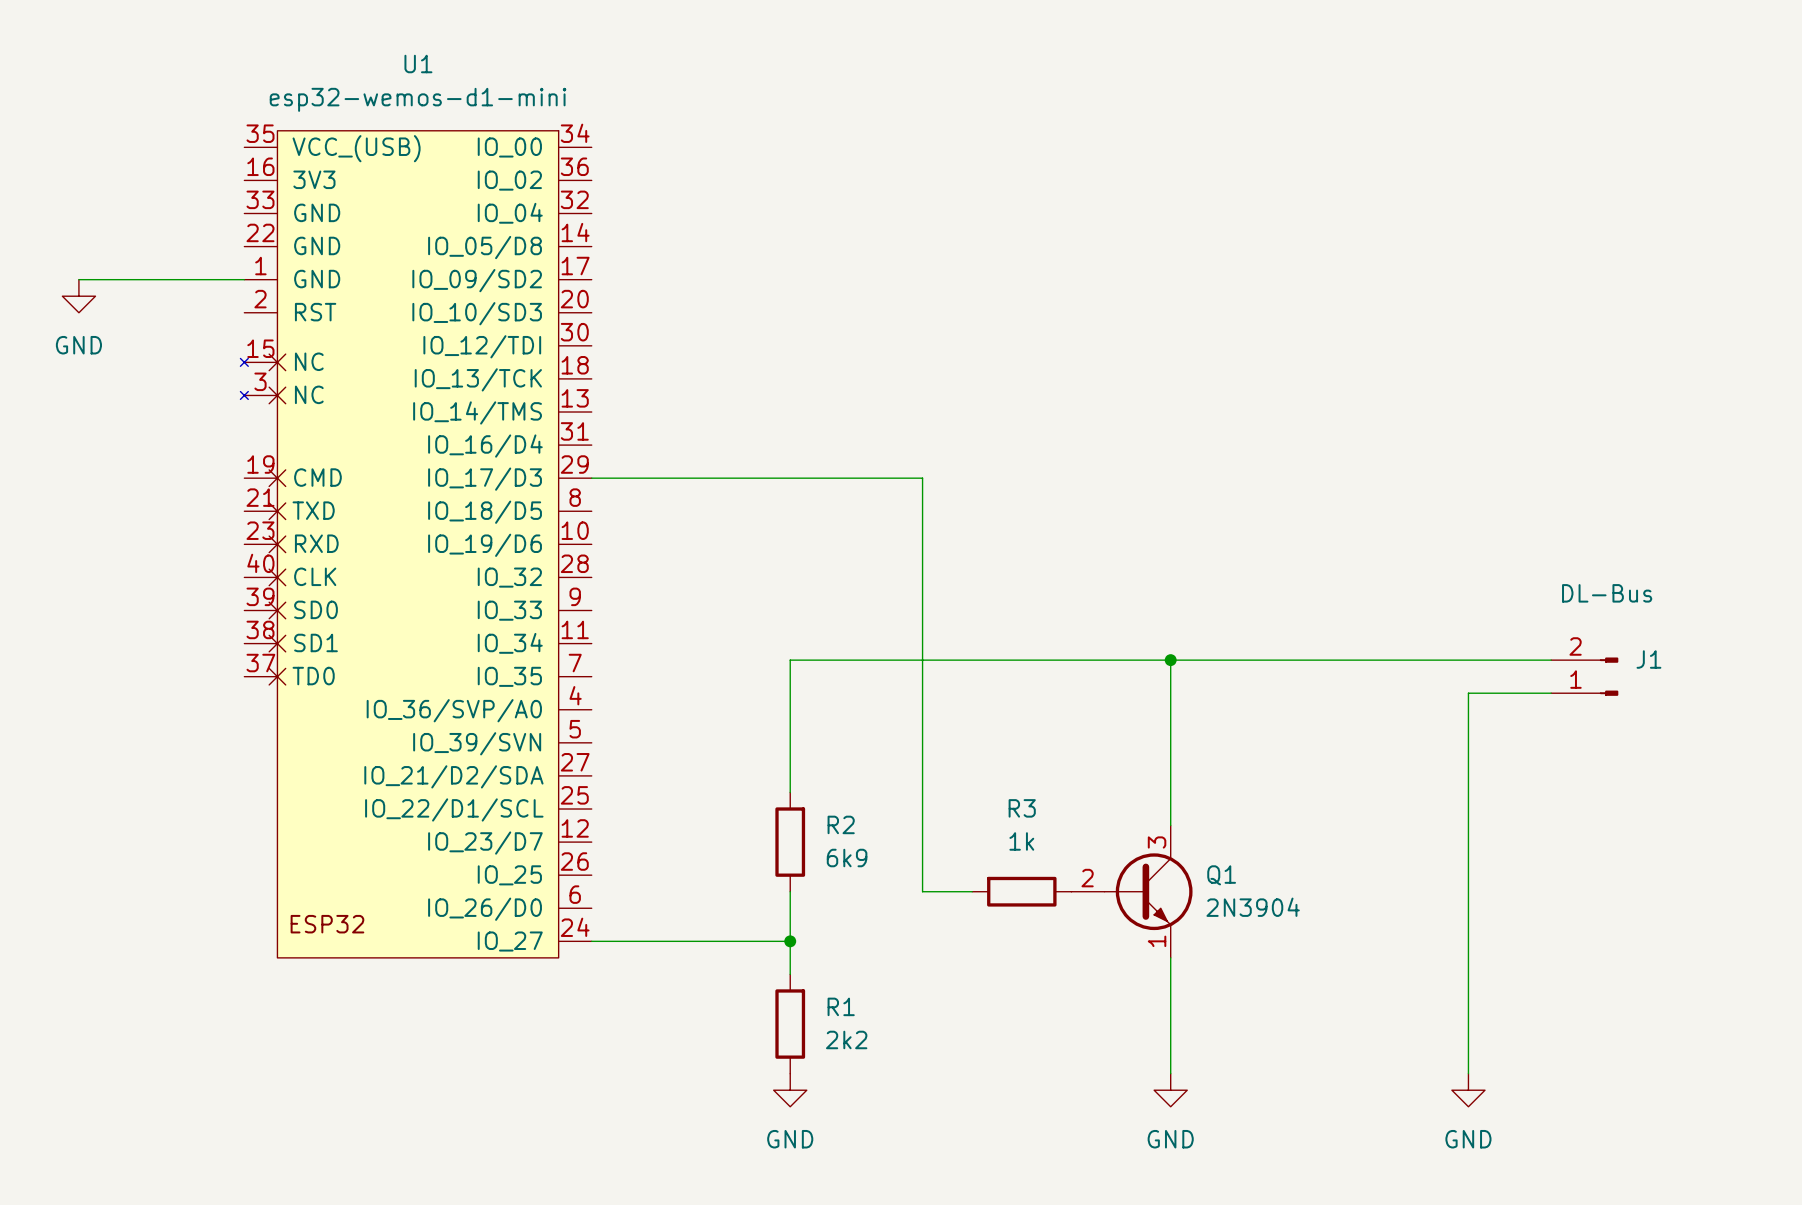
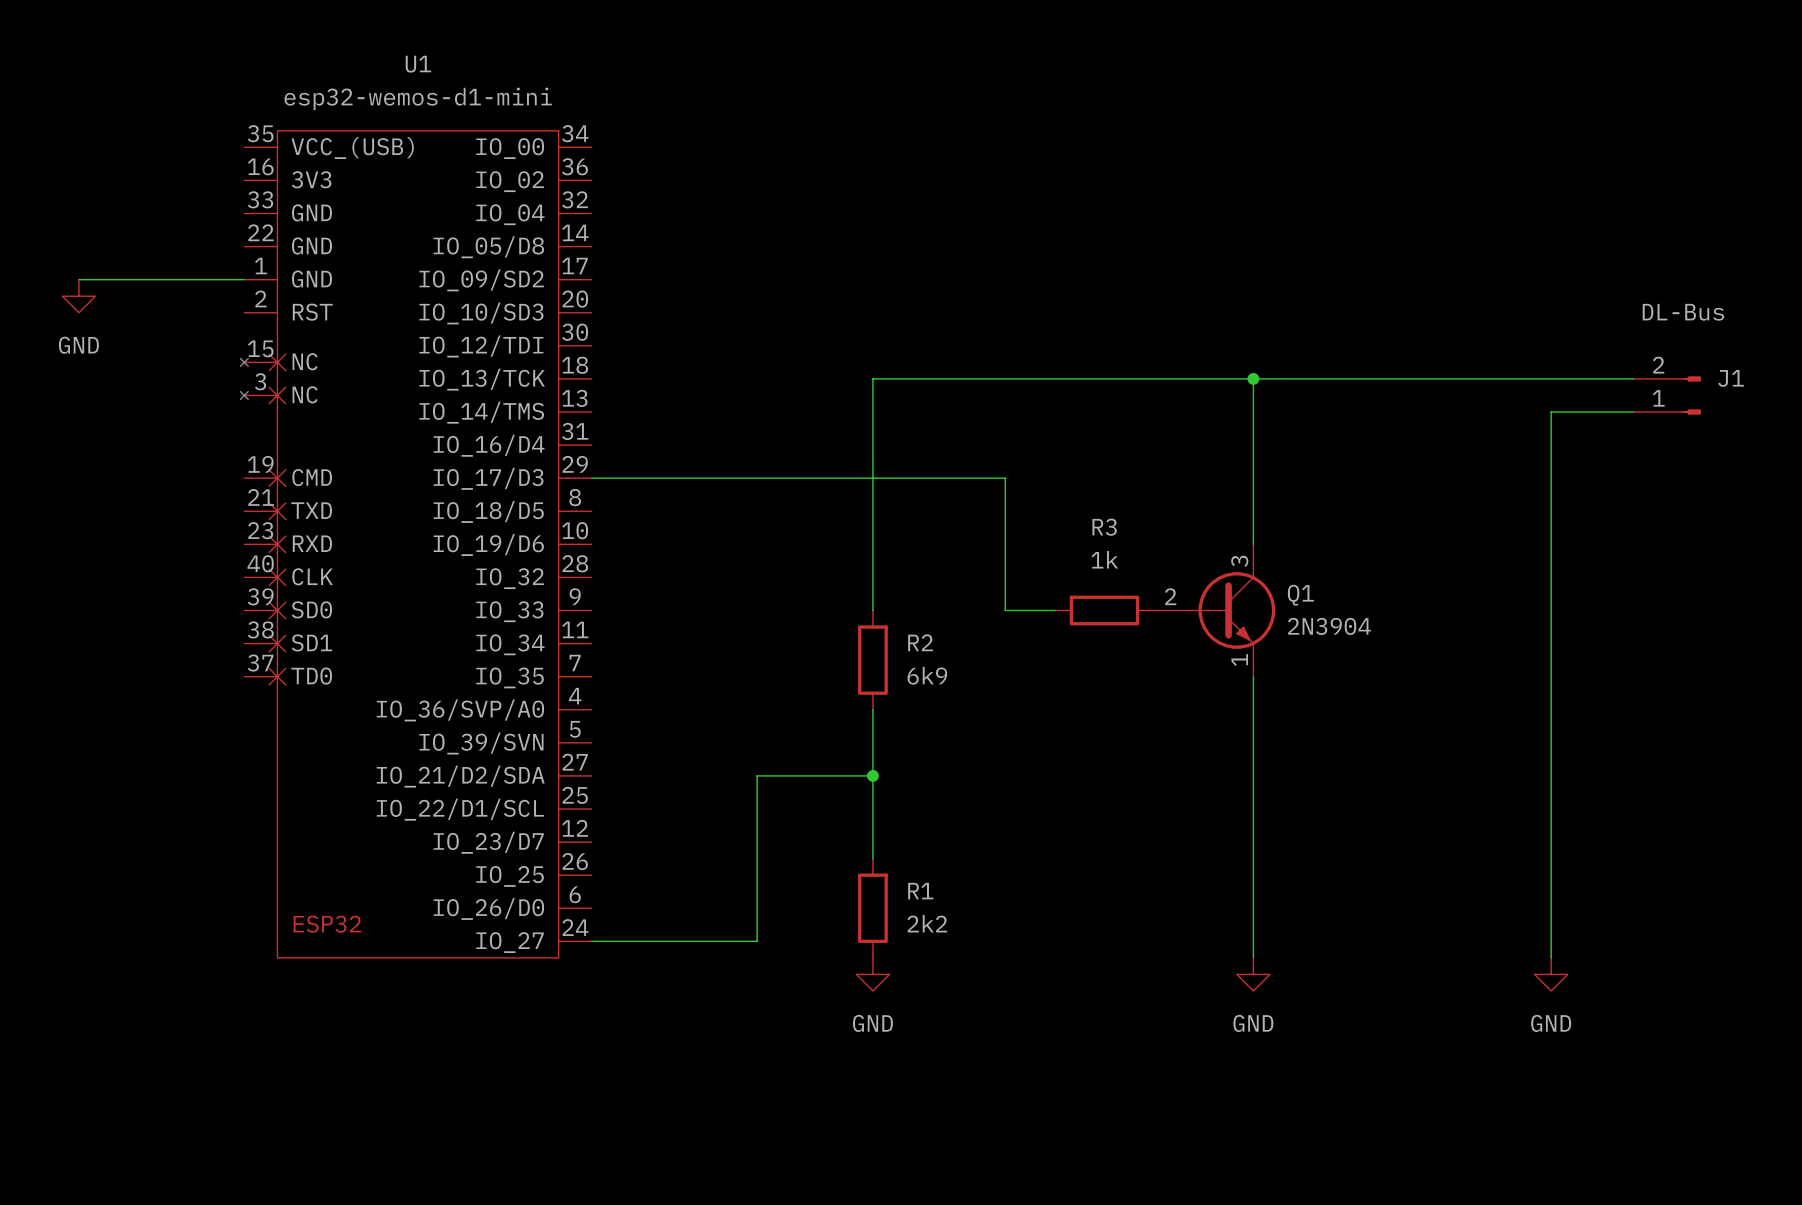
junction: none -> (1253, 378)
wire: none -> (1633, 378) (872, 378) (872, 610)
wire: none -> (1633, 412) (1551, 412) (1551, 957)
wire: (922, 478) (922, 891) (972, 891) -> (922, 478) (1005, 478) (1005, 610) (1054, 610)
wire: (1170, 660) (1170, 825) -> (1253, 378) (1253, 544)
junction: (1170, 660) -> none
wire: (1551, 660) (790, 660) (790, 792) -> none
wire: none -> (1253, 676) (1253, 957)
J1 position: (1584, 676) -> (1667, 395)
wire: (1551, 693) (1468, 693) (1468, 1073) -> none
wire: none -> (872, 709) (872, 858)
junction: none -> (872, 775)
R2 position: (790, 842) -> (872, 660)
wire: (790, 891) (790, 974) -> none
R3 position: (1021, 891) -> (1104, 610)
Q1 position: (1131, 891) -> (1214, 610)
wire: (757, 941) (790, 941) -> (757, 941) (757, 775) (872, 775)
junction: (790, 941) -> none
wire: (1170, 957) (1170, 1073) -> none
power symbol: none -> GND (1253, 974)
power symbol: none -> GND (1551, 974)
R1 position: (790, 1024) -> (872, 908)
power symbol position: GND (790, 1090) -> GND (872, 974)
power symbol: GND (1170, 1090) -> none
power symbol: GND (1468, 1090) -> none

